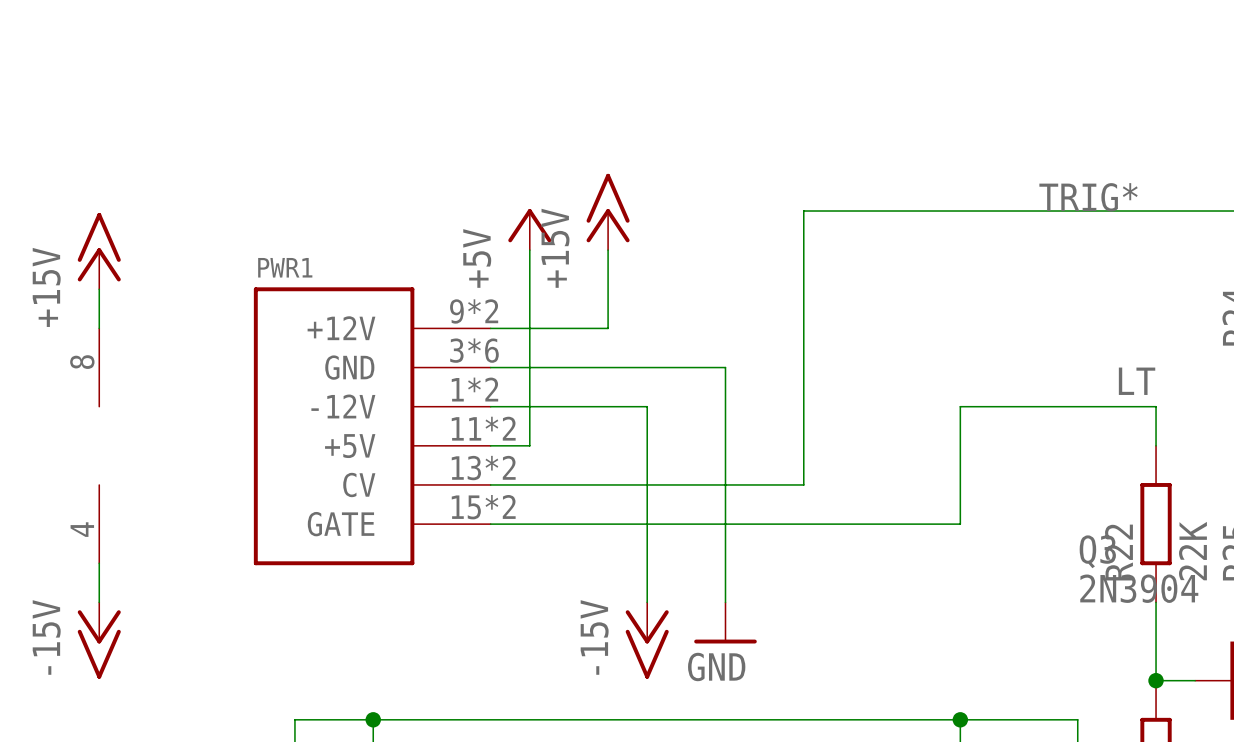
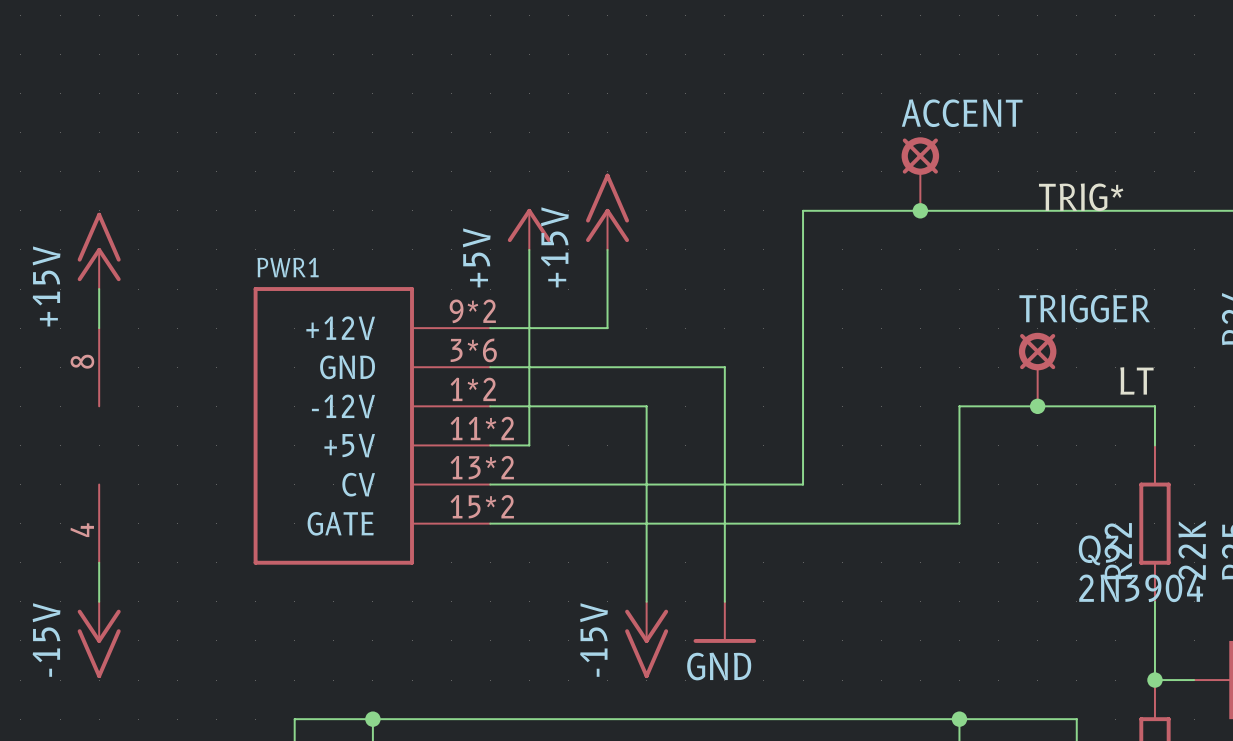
ACCENT: none -> (920, 174)
junction: none -> (920, 210)
TRIGGER: none -> (1037, 369)
junction: none -> (1037, 406)

